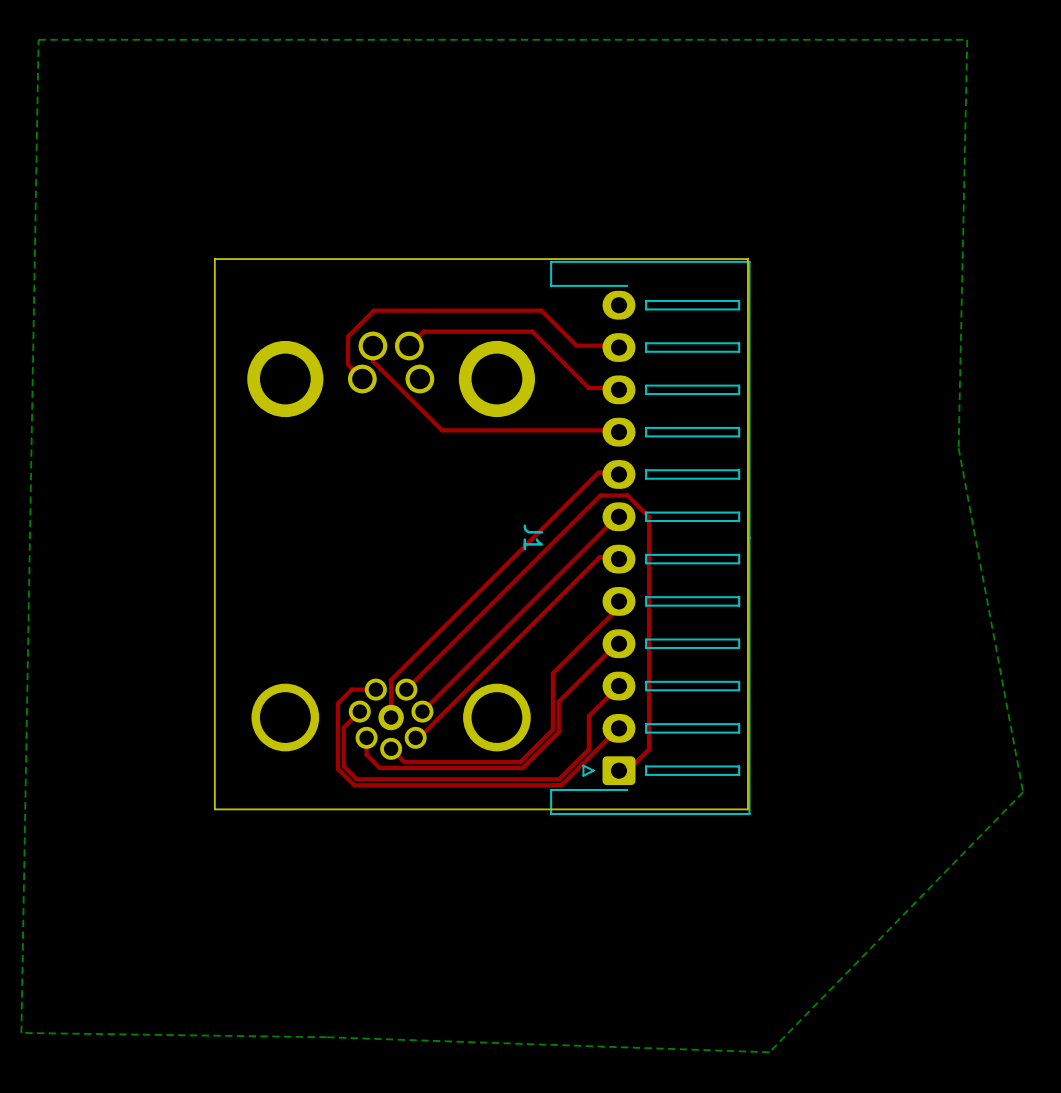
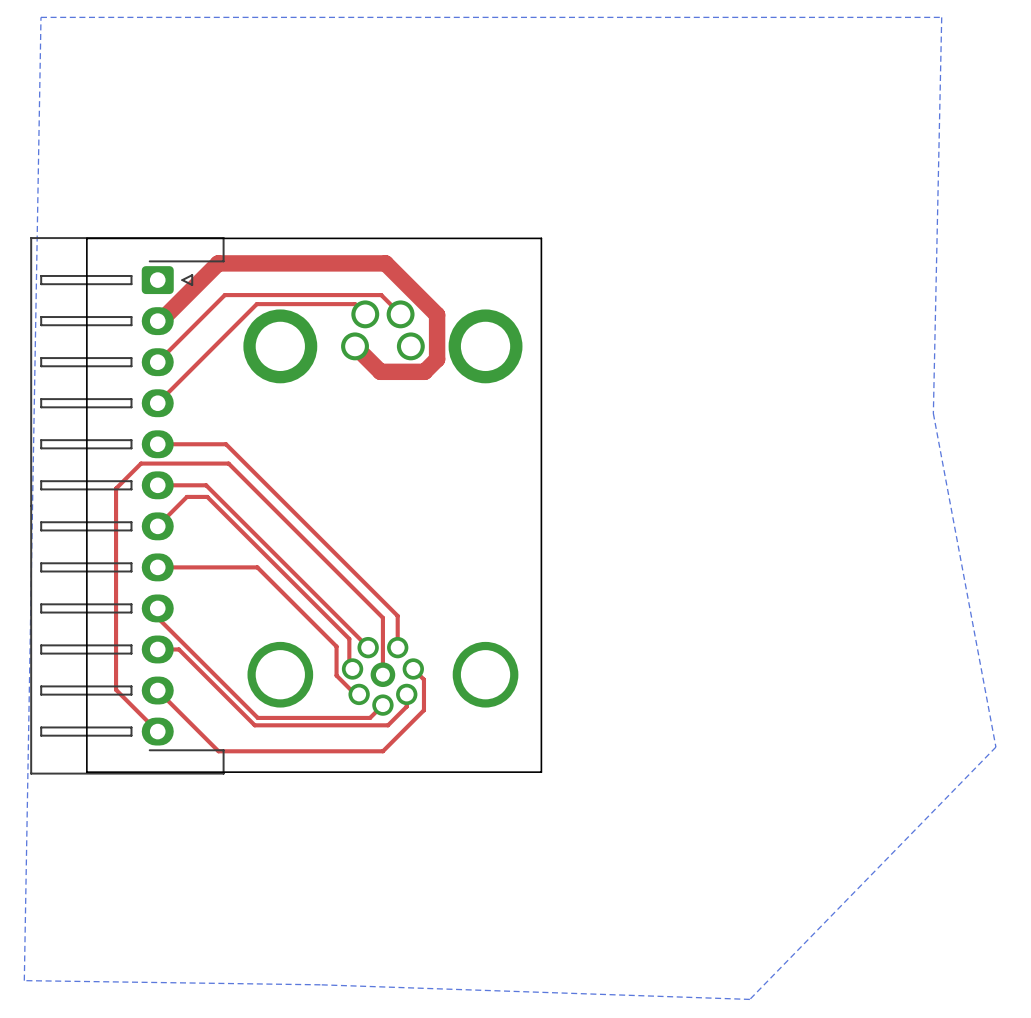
board edge: (747, 259) (214, 259) (214, 809) (747, 809) (747, 259) -> (541, 238) (541, 772) (86, 772) (86, 238) (541, 238)
top track: (372, 345) (372, 361) (442, 430) (617, 430) (618, 432) -> (365, 314) (355, 304) (256, 304) (157, 403)
top track: (409, 345) (423, 331) (532, 331) (588, 388) (617, 388) (618, 389) -> (400, 314) (381, 295) (224, 295) (157, 362)
top track: (618, 347) (617, 345) (576, 345) (541, 310) (373, 310) (347, 336) (347, 364) (362, 379) -> (157, 321) (160, 321) (218, 263) (385, 263) (437, 314) (437, 359) (424, 371) (380, 371) (355, 346)
top track: (618, 474) (617, 472) (598, 472) (391, 679) -> (157, 731) (116, 689) (116, 488) (141, 463) (228, 463) (382, 617) (382, 638)
top track: (618, 516) (422, 711) -> (157, 690) (218, 751) (382, 751) (423, 710) (423, 679) (413, 668)
J1: (650, 537) -> none
part: none -> (127, 505)
top track: (618, 559) (617, 557) (599, 557) (419, 737) (415, 737) -> (157, 649) (178, 649) (254, 725) (388, 725) (406, 706) (406, 694)
top track: (618, 601) (618, 607) (552, 673) (552, 729) (520, 762) (404, 762) (391, 748) -> (157, 608) (157, 617) (257, 717) (370, 717) (382, 705)
top track: (618, 643) (616, 643) (558, 701) (558, 731) (522, 768) (379, 768) (366, 754) (366, 737) -> (157, 567) (257, 567) (336, 646) (336, 675) (355, 694) (359, 694)
top track: (618, 686) (588, 716) (588, 749) (559, 779) (356, 779) (343, 766) (343, 727) (359, 711) -> (157, 526) (186, 496) (207, 496) (349, 638) (349, 665) (352, 668)
top track: (375, 689) (351, 689) (337, 703) (337, 768) (354, 785) (561, 785) (618, 728) -> (368, 647) (206, 485) (157, 485)
top track: (406, 689) (600, 495) (627, 495) (649, 517) (649, 749) (627, 770) (618, 770) -> (397, 647) (397, 615) (226, 444) (157, 444)

